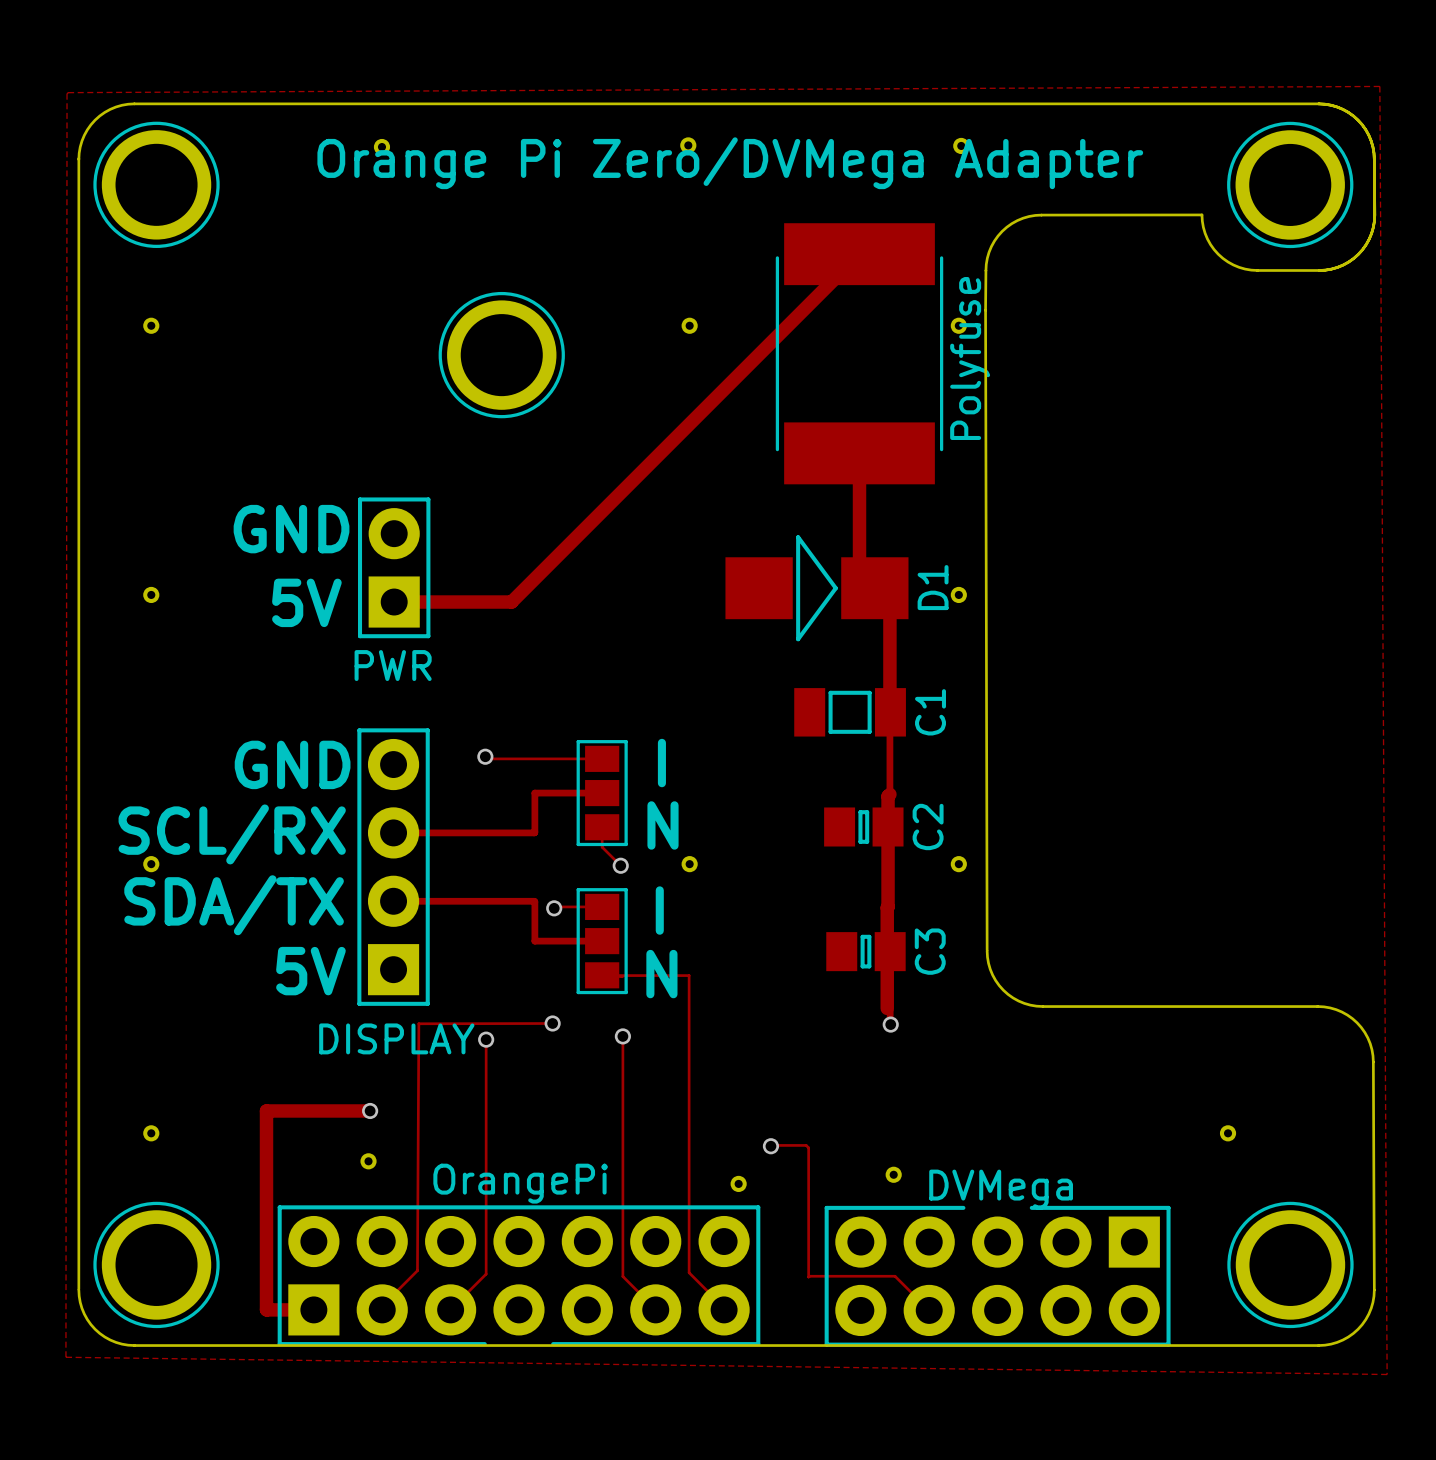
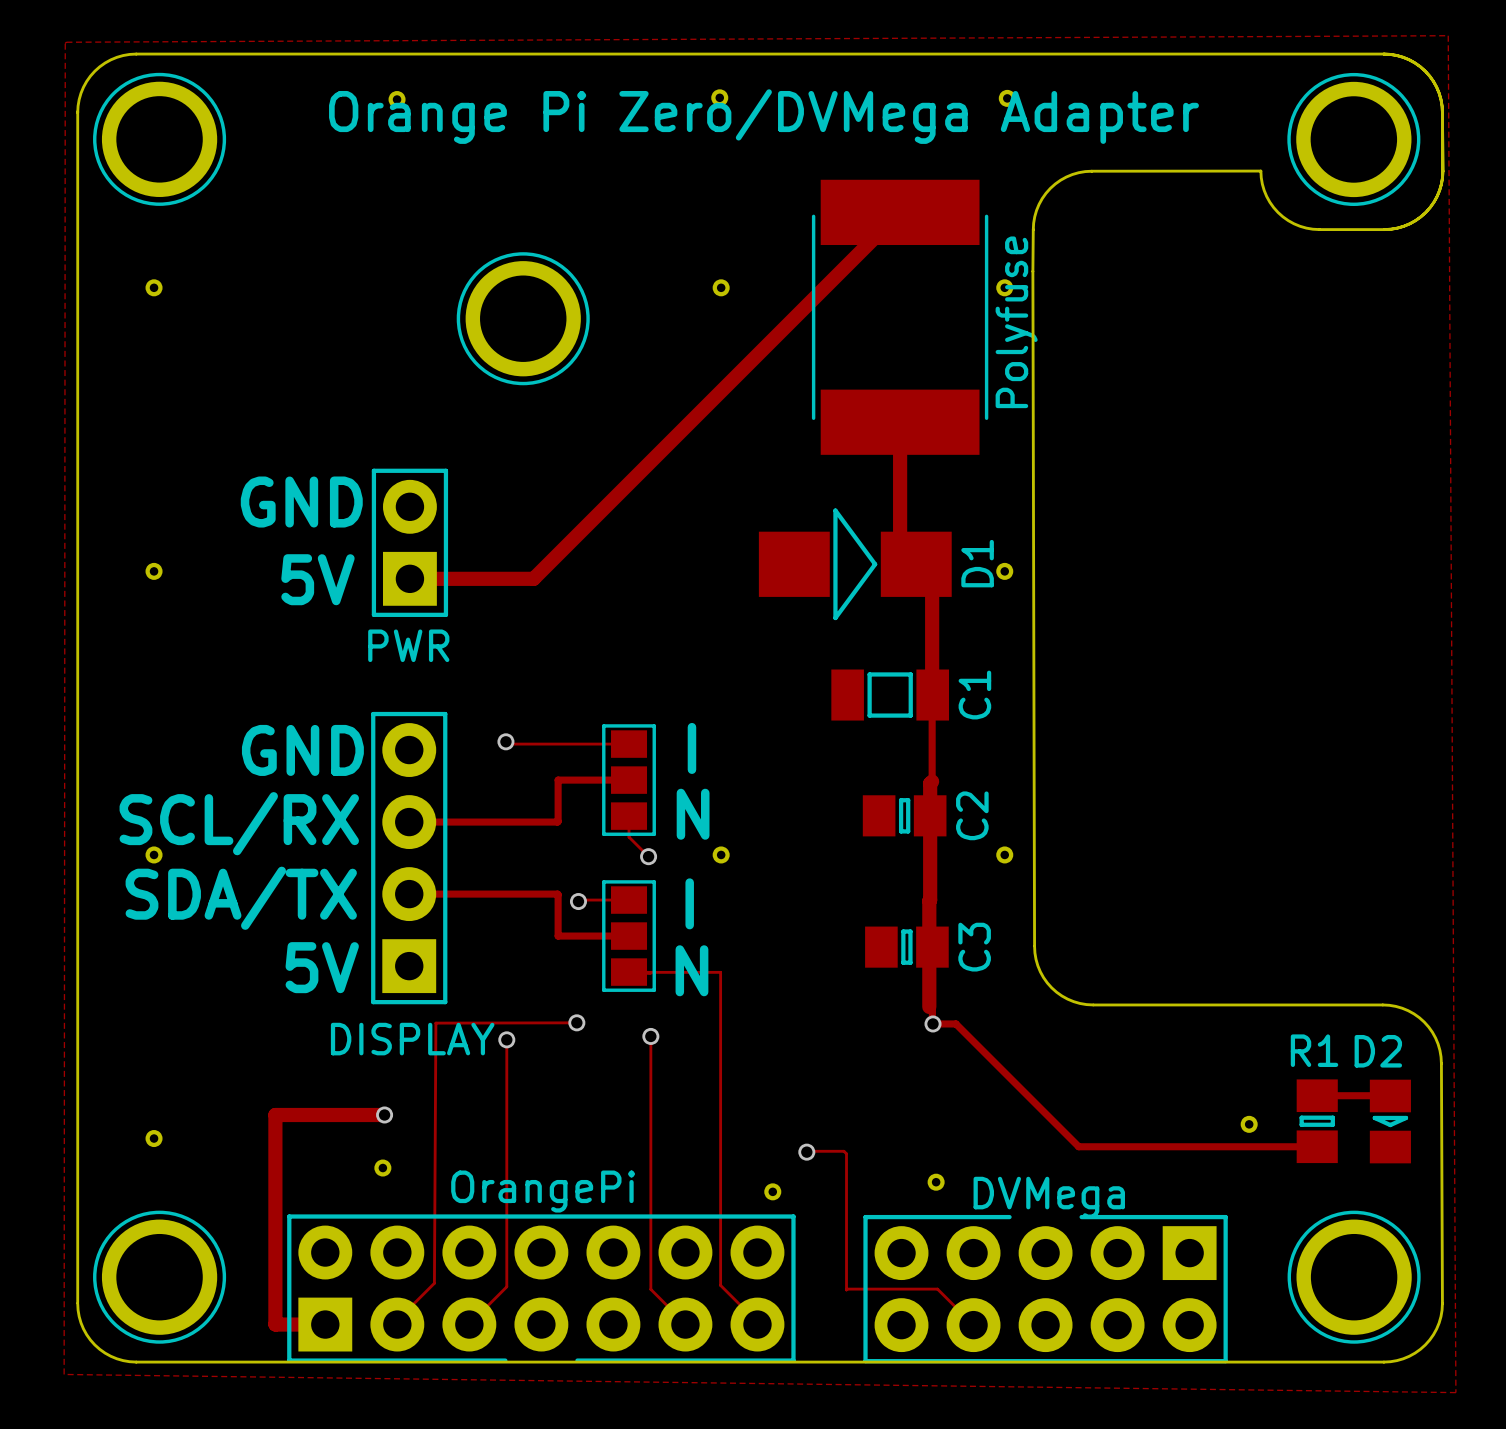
track: none -> (933, 1023) (955, 1023) (1078, 1146) (1317, 1146)
track: none -> (1317, 1095) (1390, 1095)
R1: none -> (1317, 1121)
D2: none -> (1390, 1121)
part position: (1228, 1133) -> (1249, 1124)

